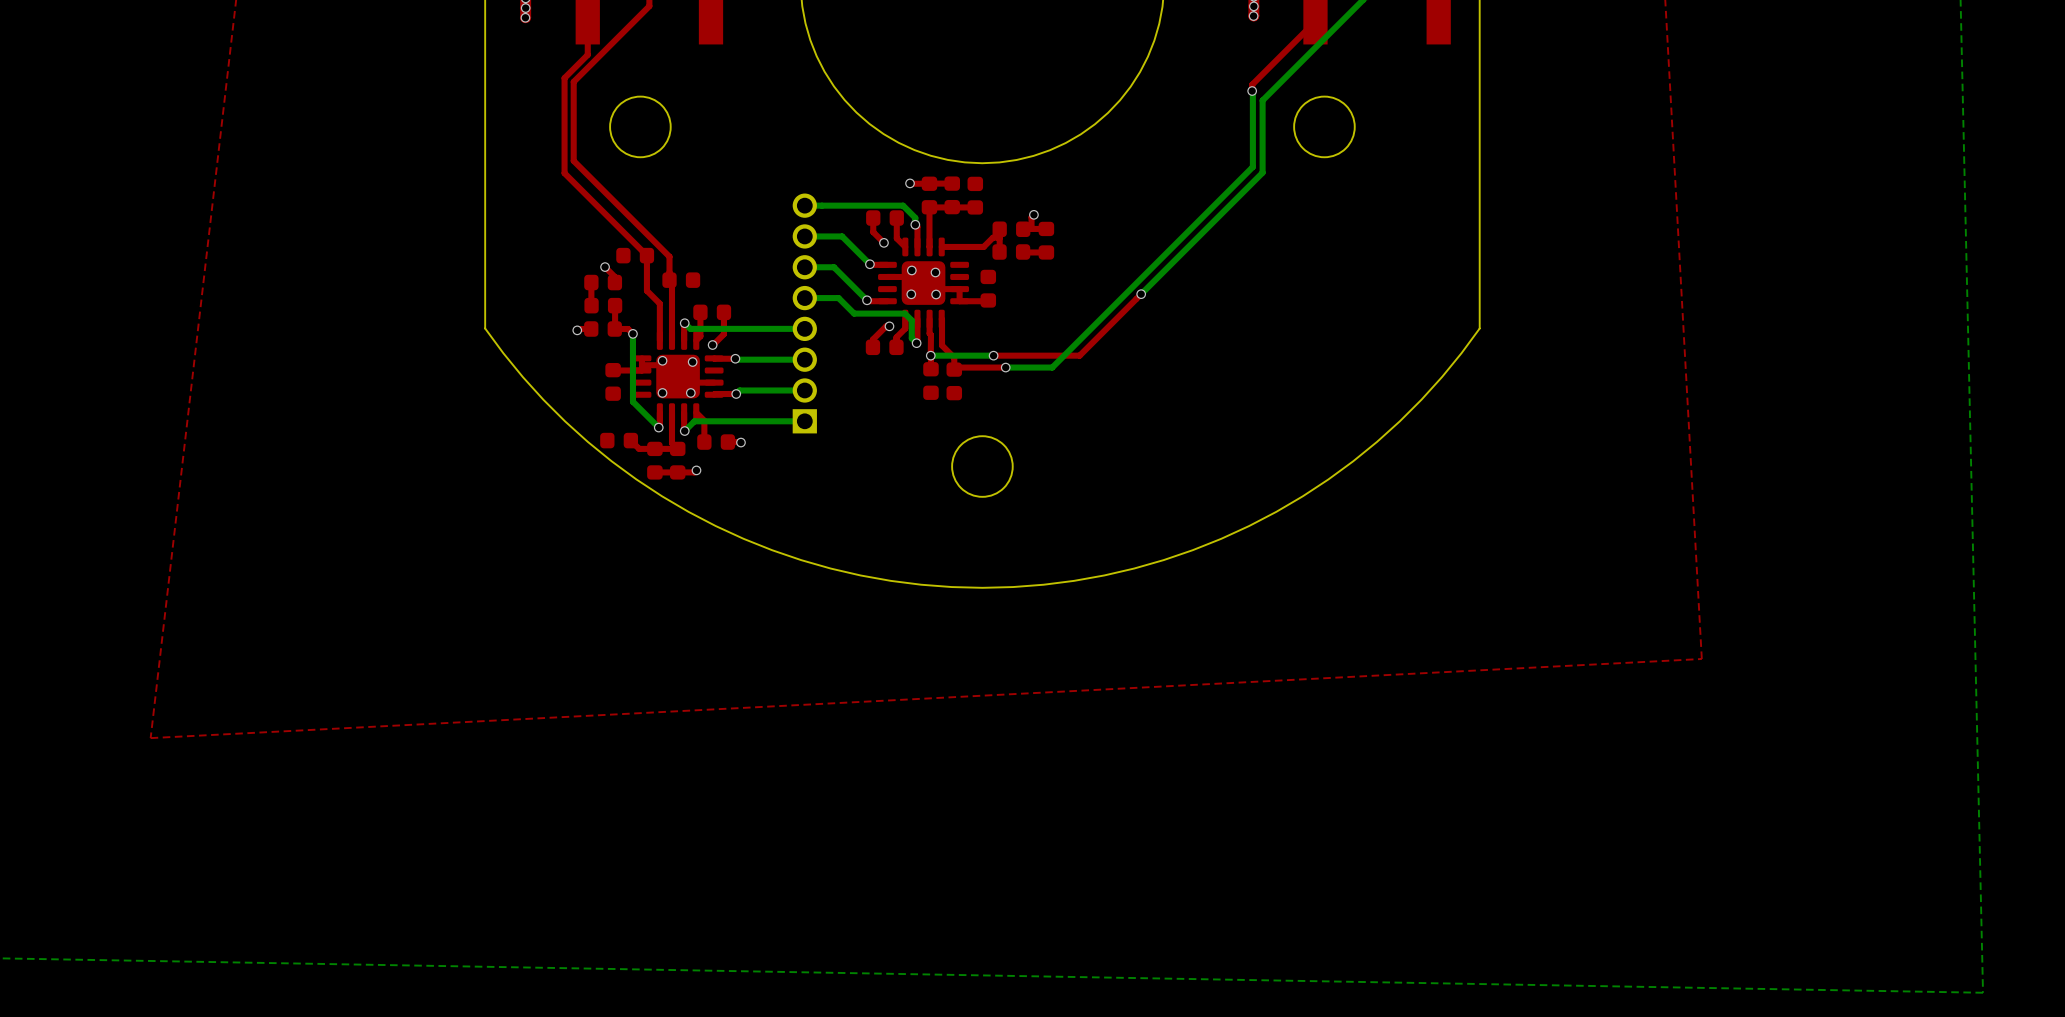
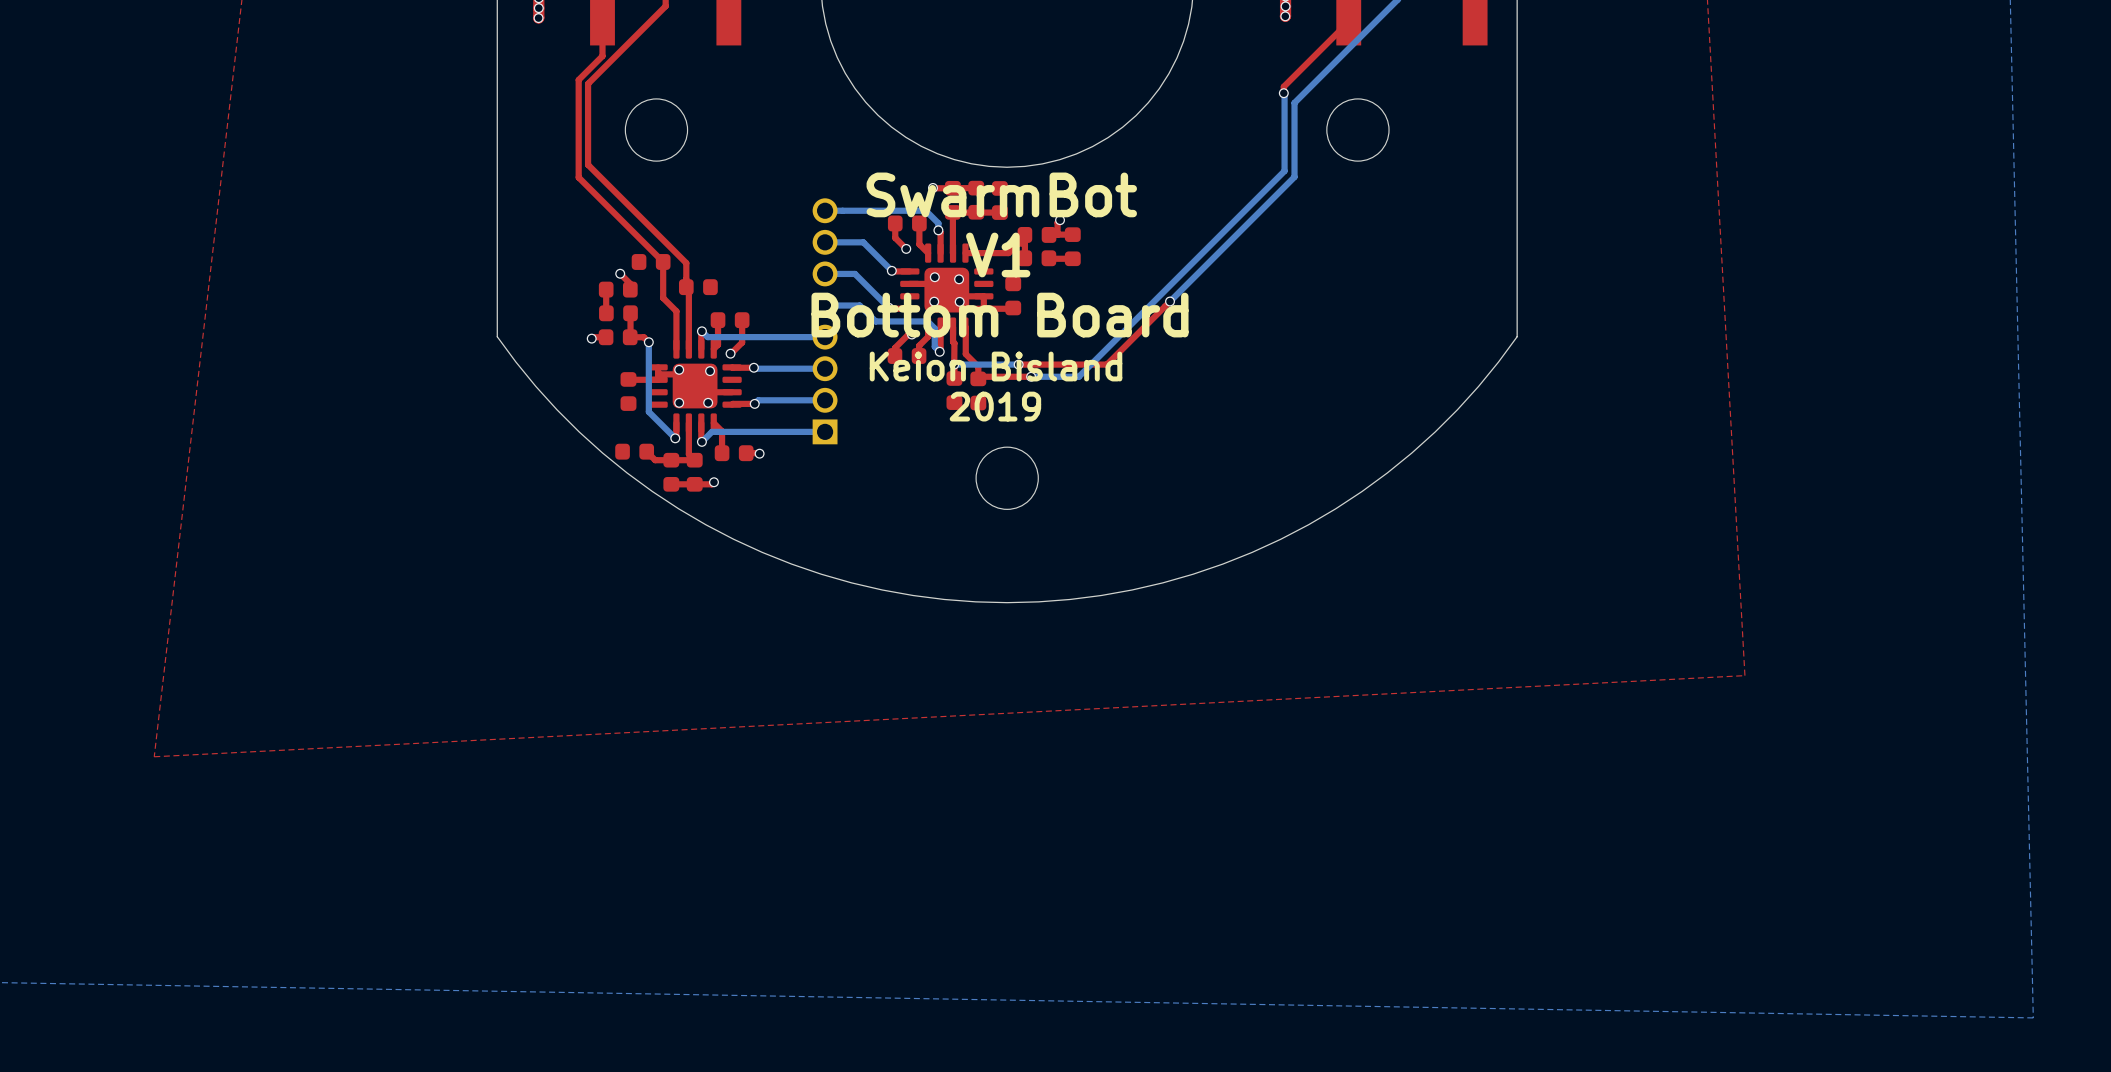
text: none -> SwarmBot (1001, 194)
text: none -> V1 (998, 254)
text: none -> Bottom Board (1000, 315)
text: none -> Keion Bisland (996, 366)
text: none -> 2019 (995, 406)

